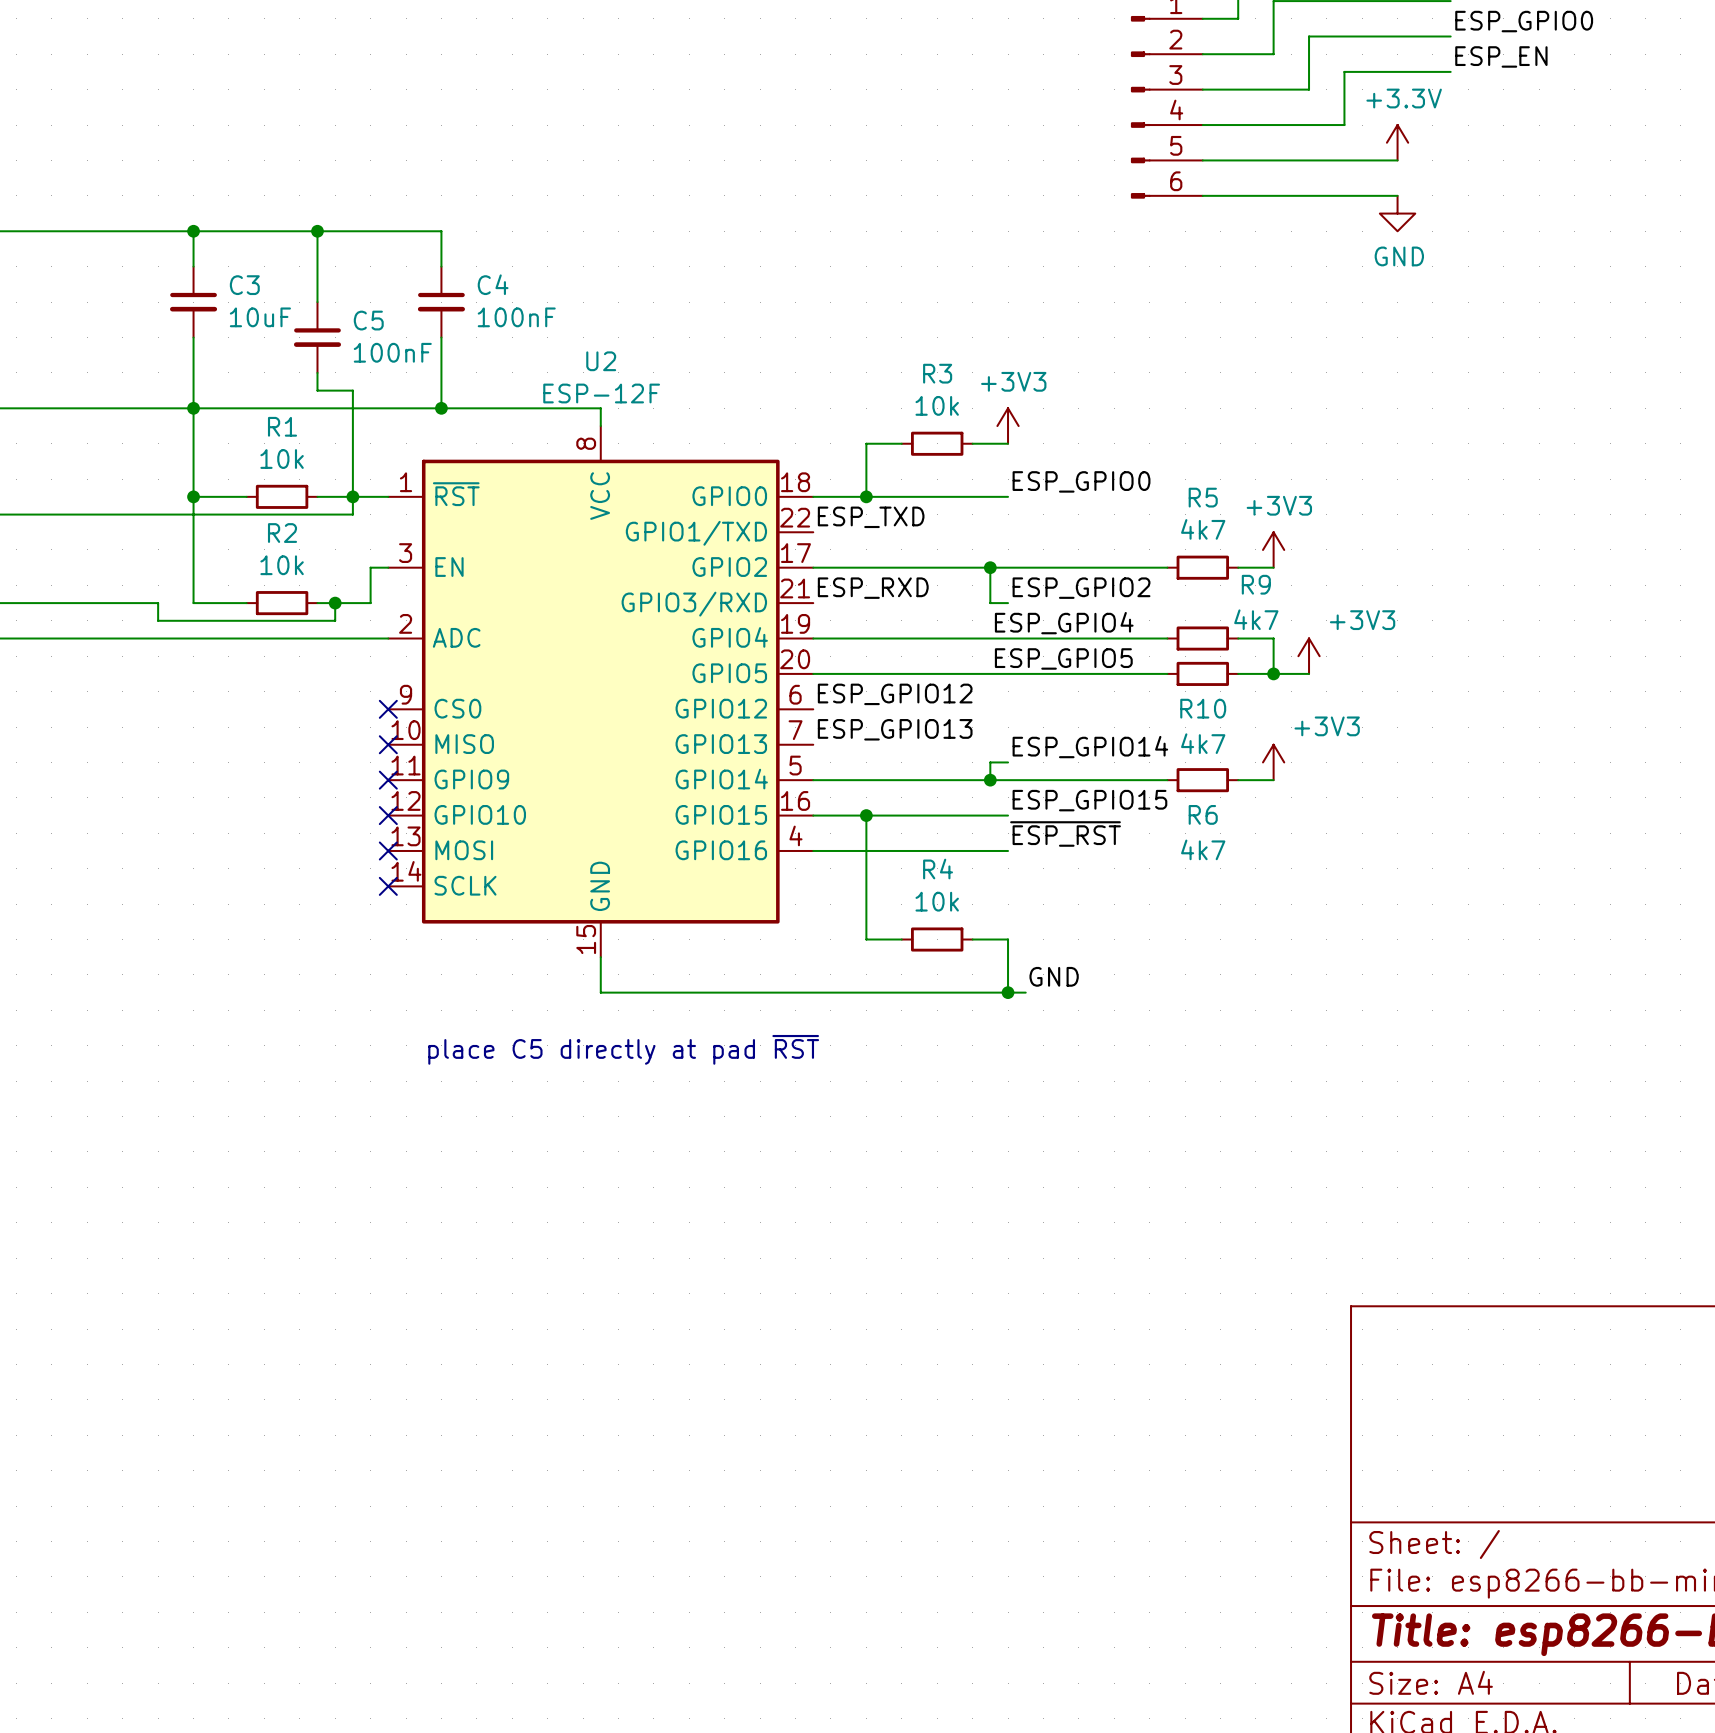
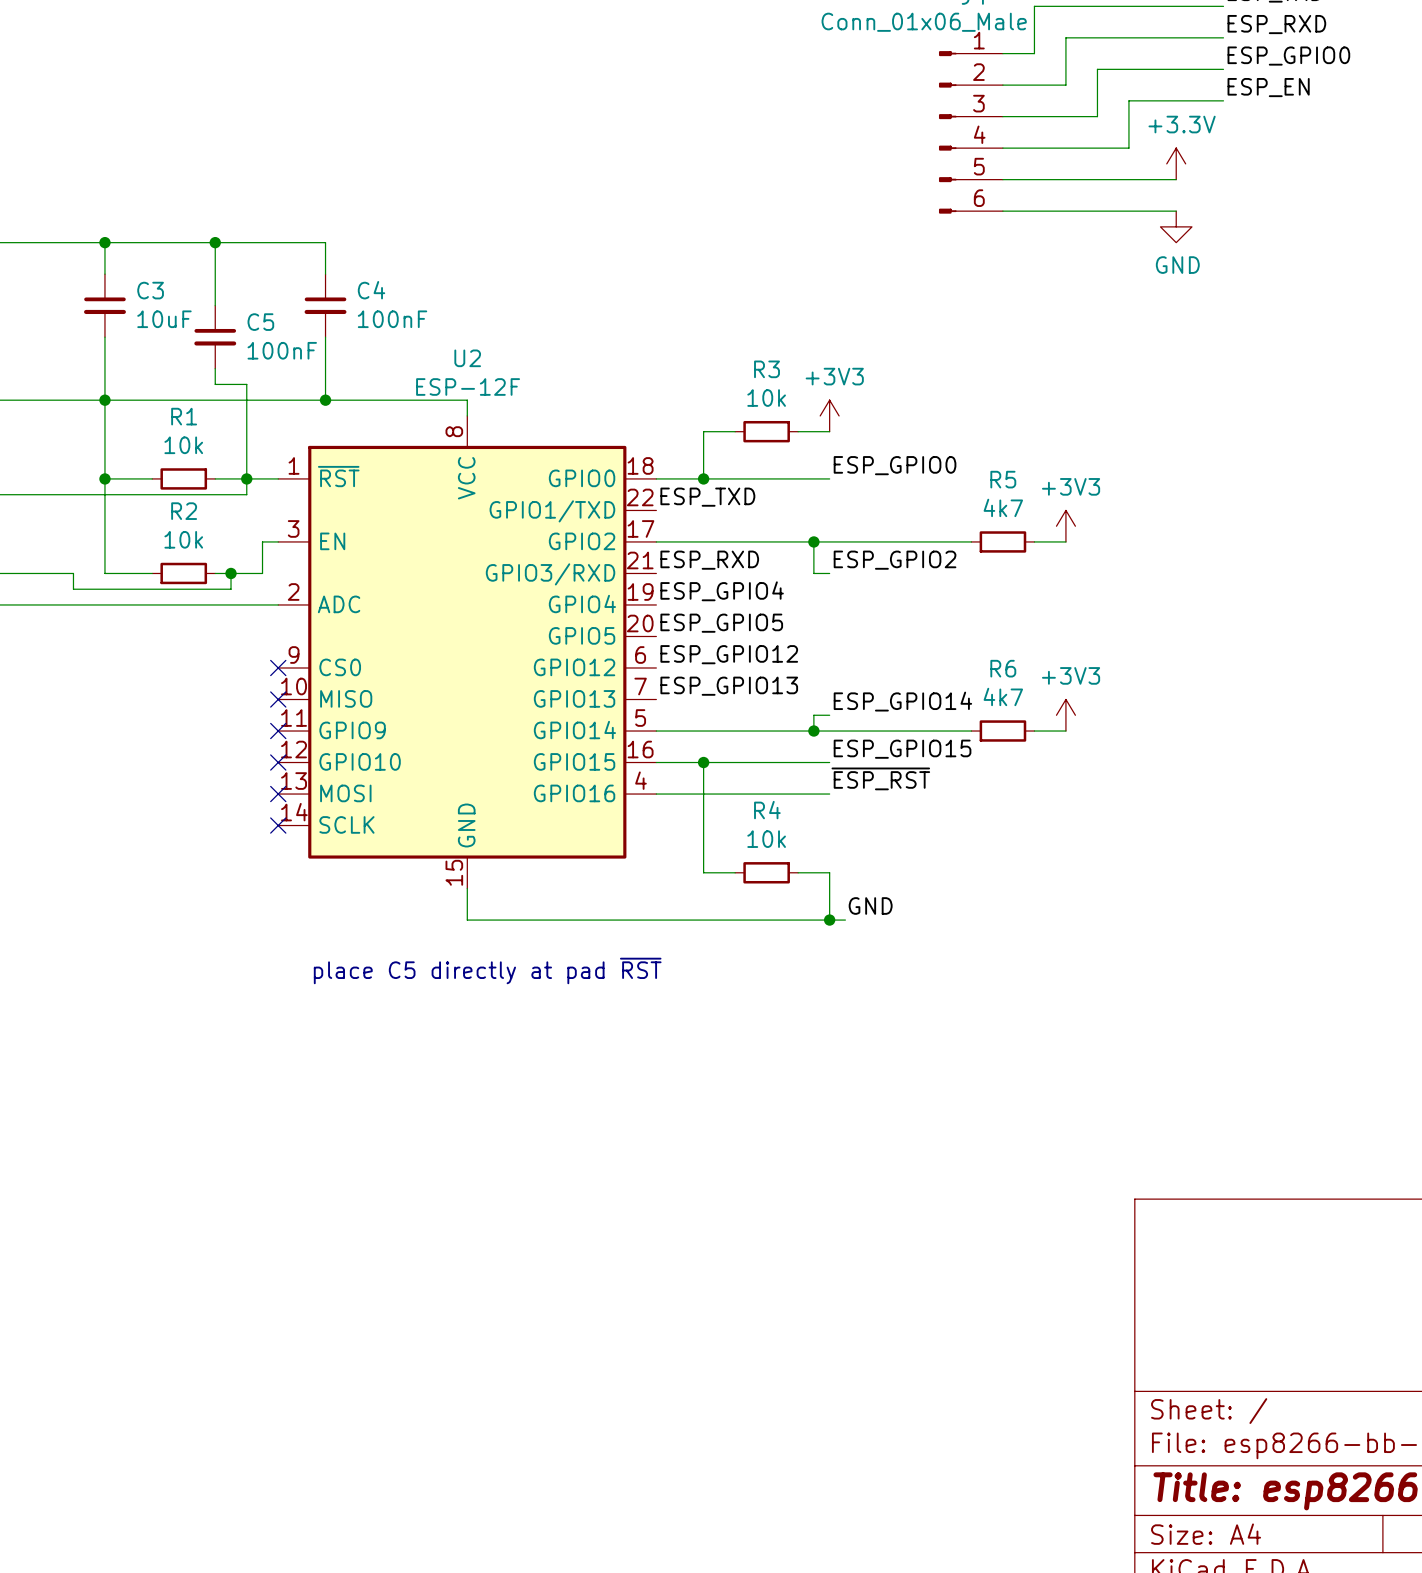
label position: ESP_GPIO4 (1064, 623) -> ESP_GPIO4 (722, 591)
wire: (813, 638) (1167, 638) -> none
R9: 4k7 (1202, 638) -> none
wire: (1238, 638) (1273, 638) (1273, 673) -> none
power symbol: +3V3 (1309, 656) -> none
label position: ESP_GPIO5 (1063, 658) -> ESP_GPIO5 (721, 623)
wire: (813, 673) (1167, 673) -> none
R10: 4k7 (1202, 673) -> none
wire: (1238, 673) (1309, 673) -> none
junction: (1273, 673) -> none
power symbol text position: +3V3 (1327, 726) -> +3V3 (1071, 675)
R6 name position: R6 (1203, 814) -> R6 (1003, 668)
R6 value position: 4k7 (1203, 849) -> 4k7 (1003, 696)

